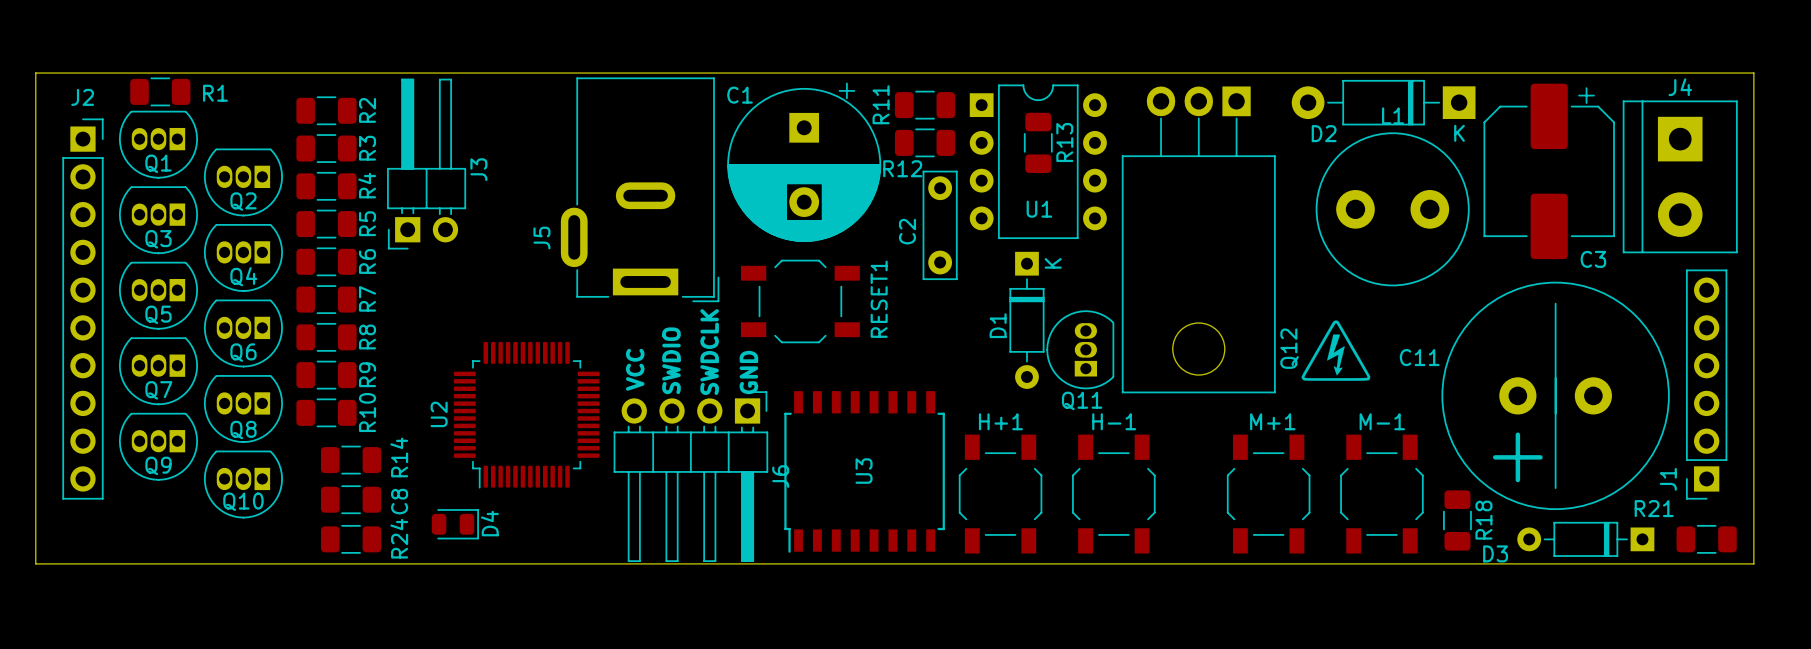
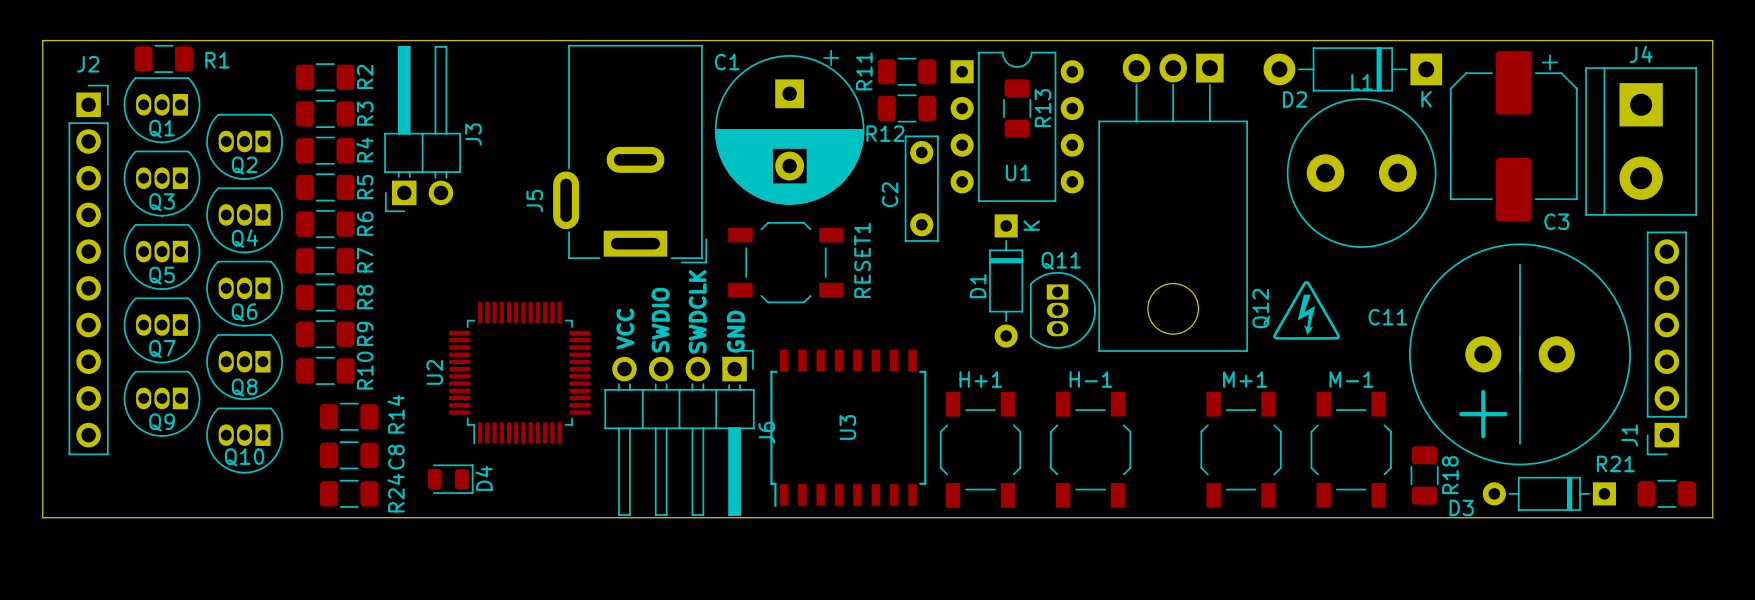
Q11 rotation: 0° (1080, 349) -> 180° (1062, 310)

